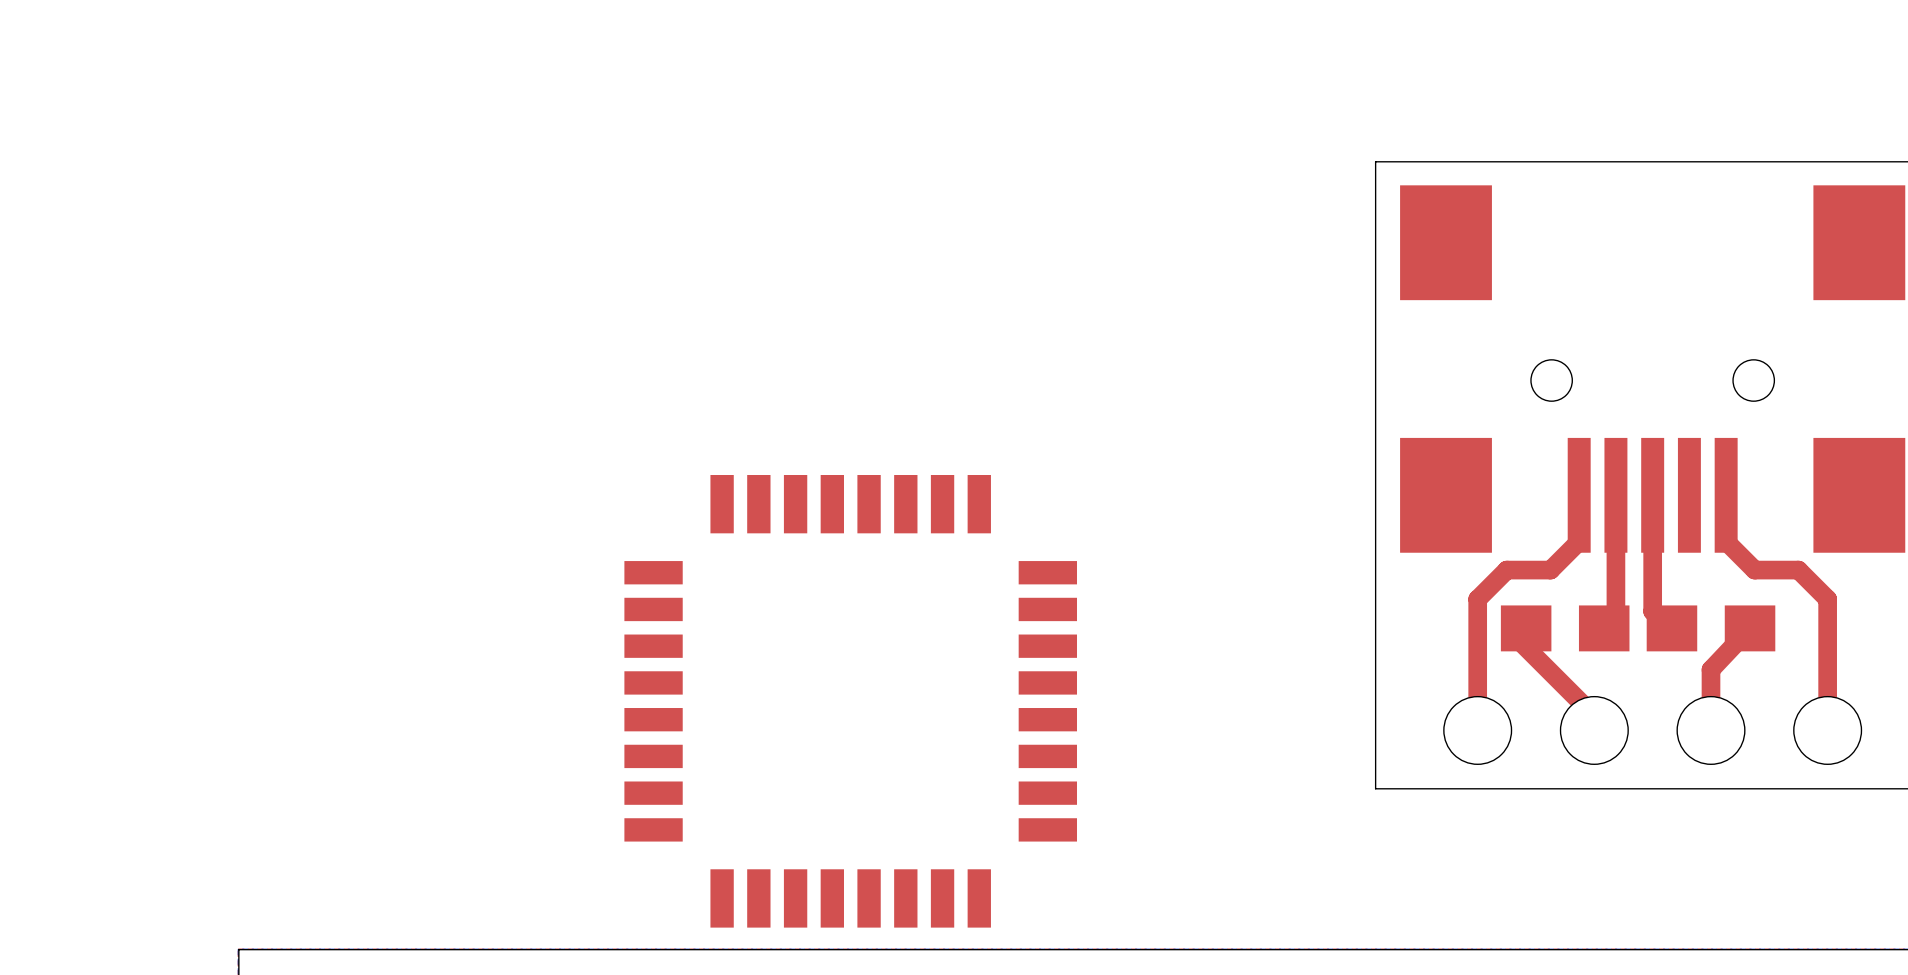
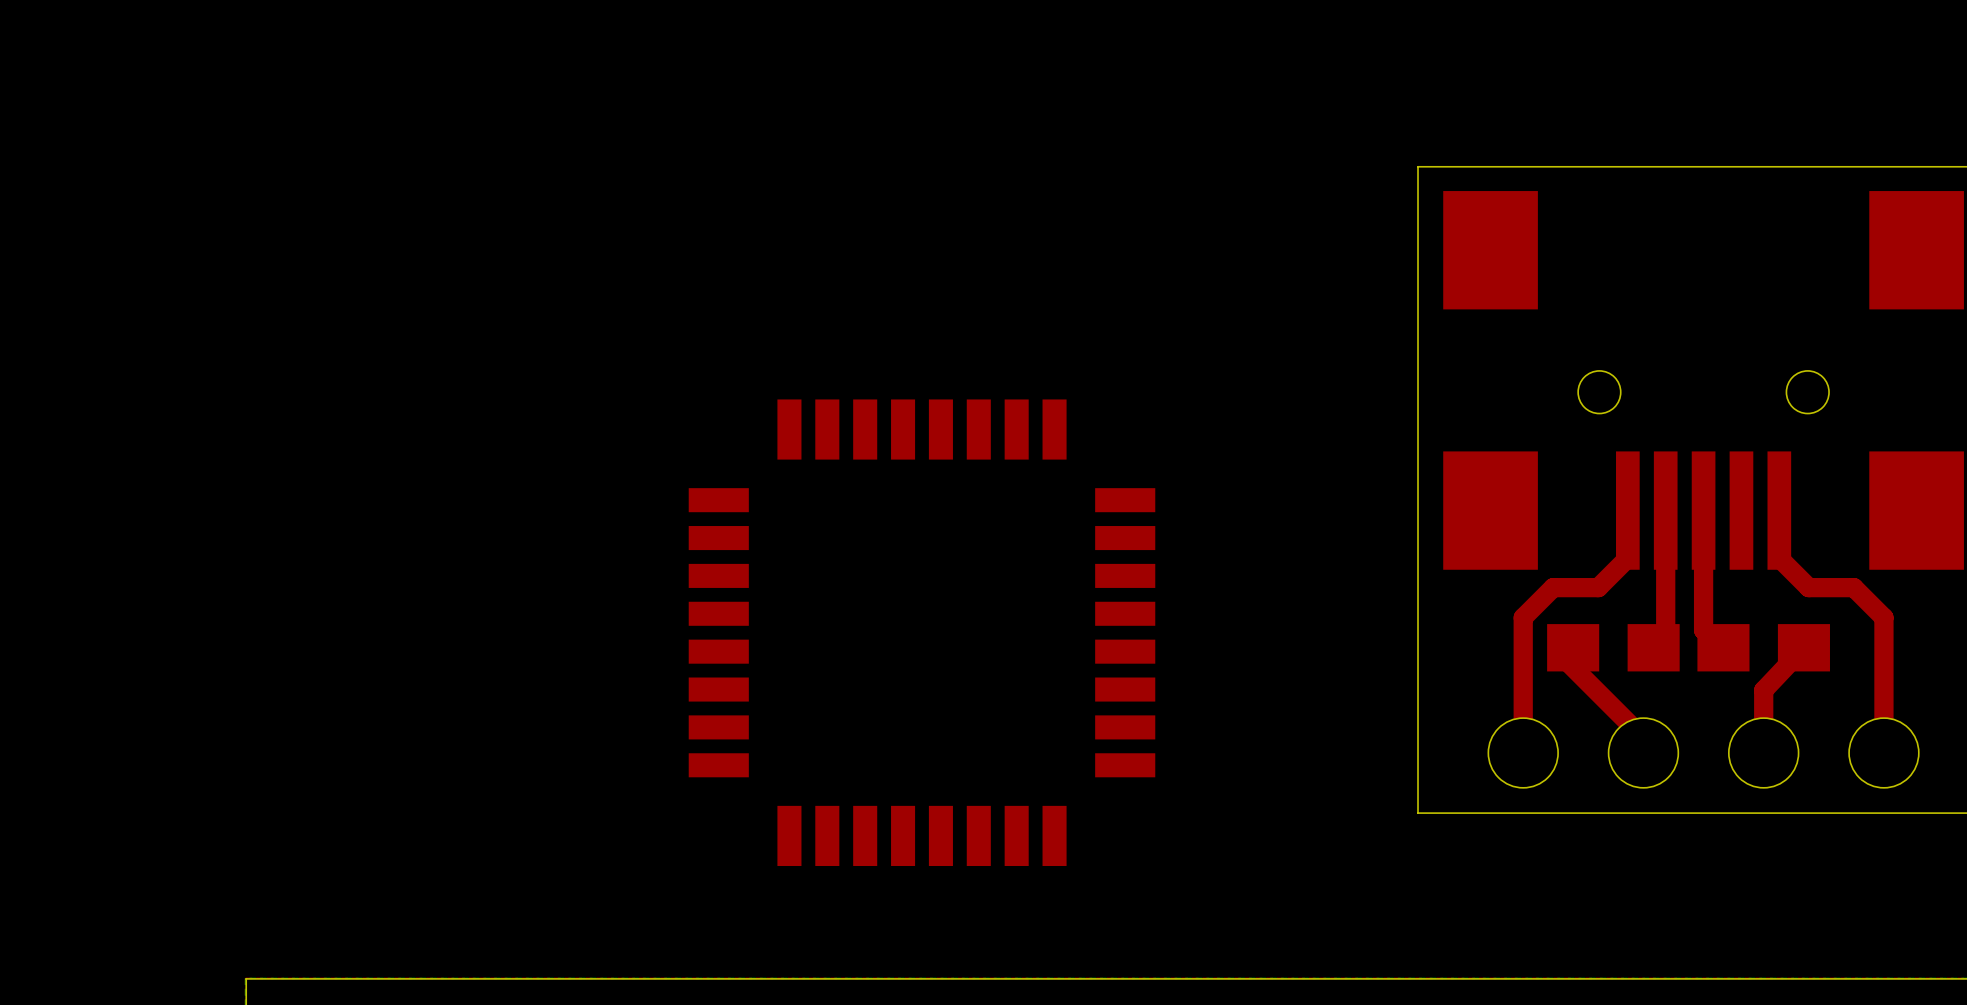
part position: (850, 701) -> (921, 632)

